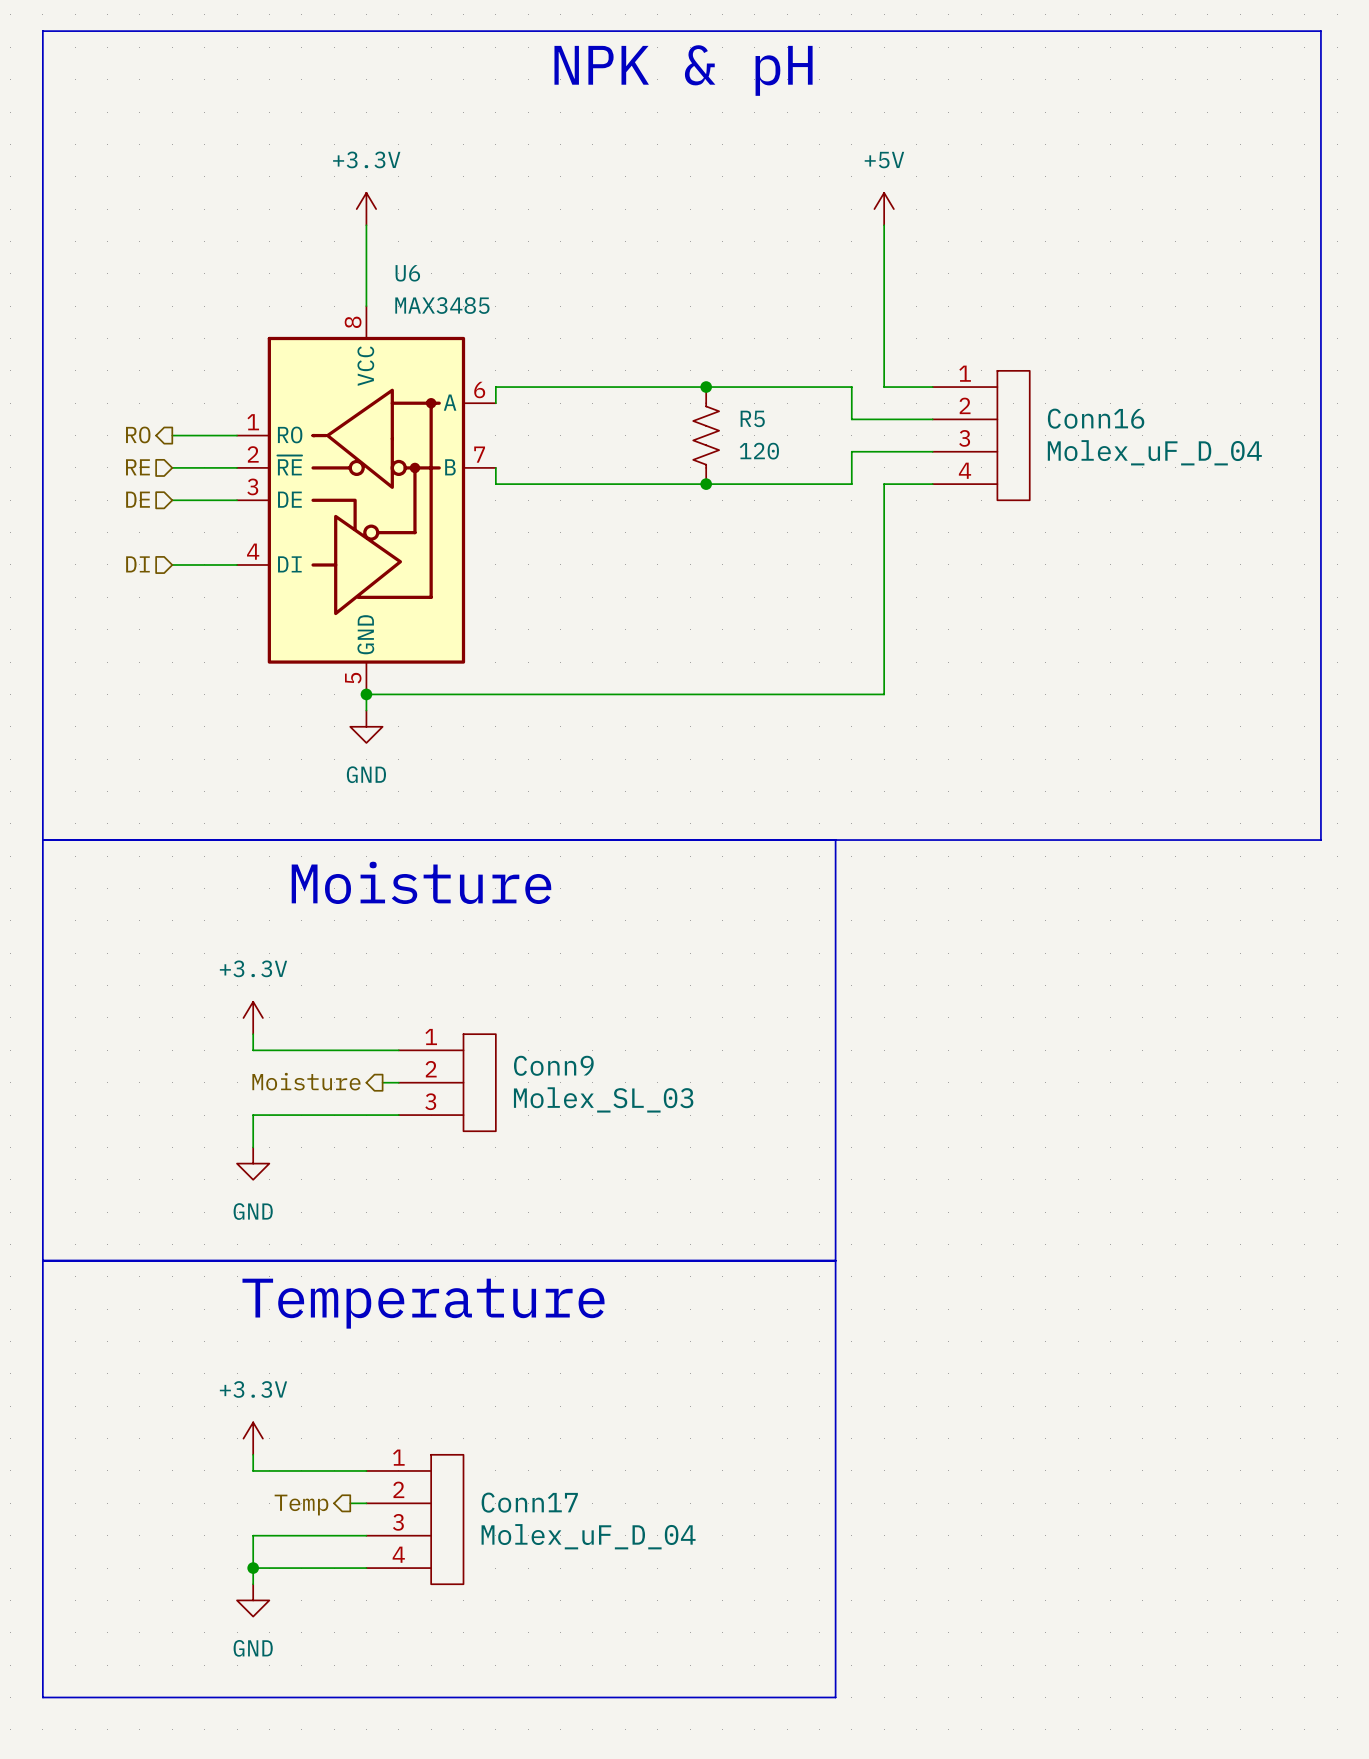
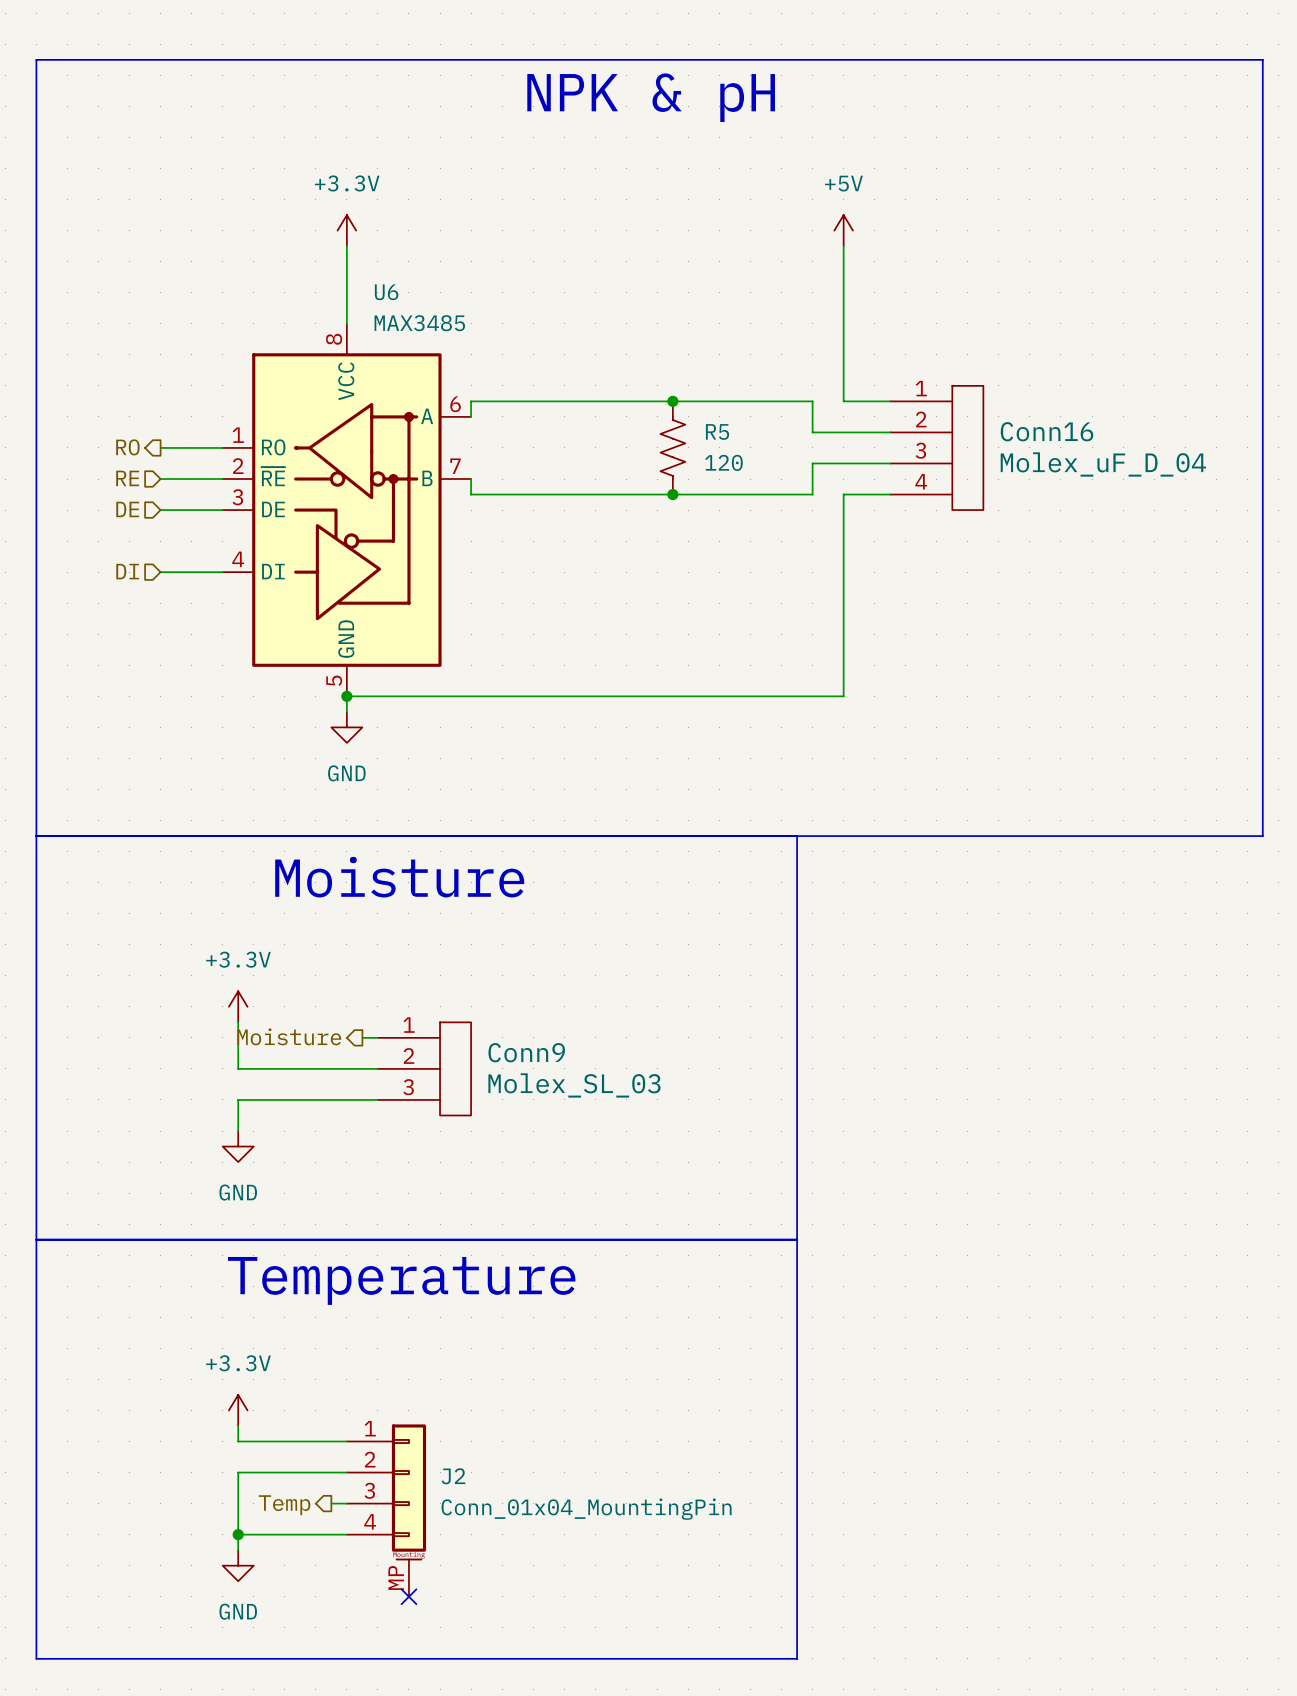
wire: (253, 1050) (382, 1050) -> (238, 1037) (238, 1068) (362, 1068)
hierarchical label position: Moisture (306, 1081) -> Moisture (289, 1036)
hierarchical label position: Temp (301, 1505) -> Temp (284, 1505)
Conn17: Molex_uF_D_04 (414, 1519) -> none
wire: (253, 1535) (350, 1535) -> (238, 1503) (238, 1472) (331, 1472)
J2: none -> Conn_01x04_MountingPin (386, 1510)
no-connect mark: none -> (408, 1596)

